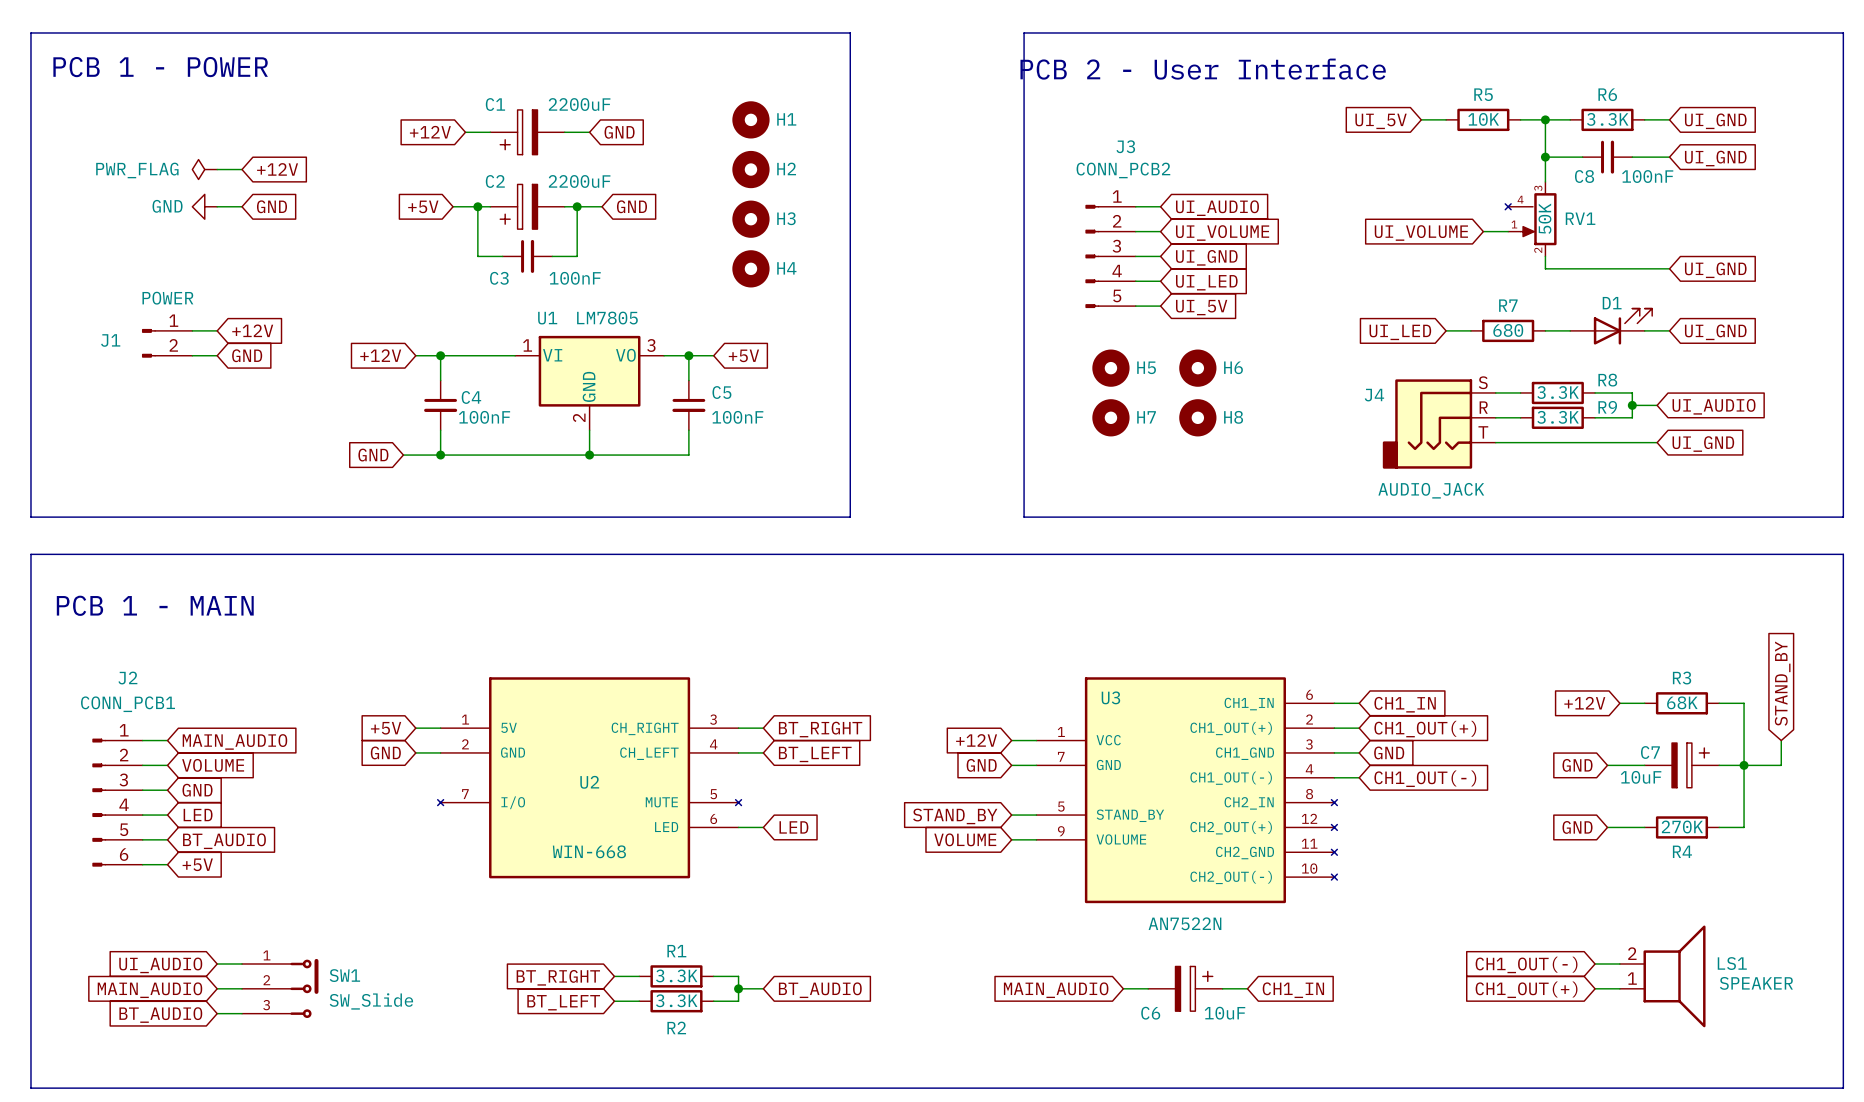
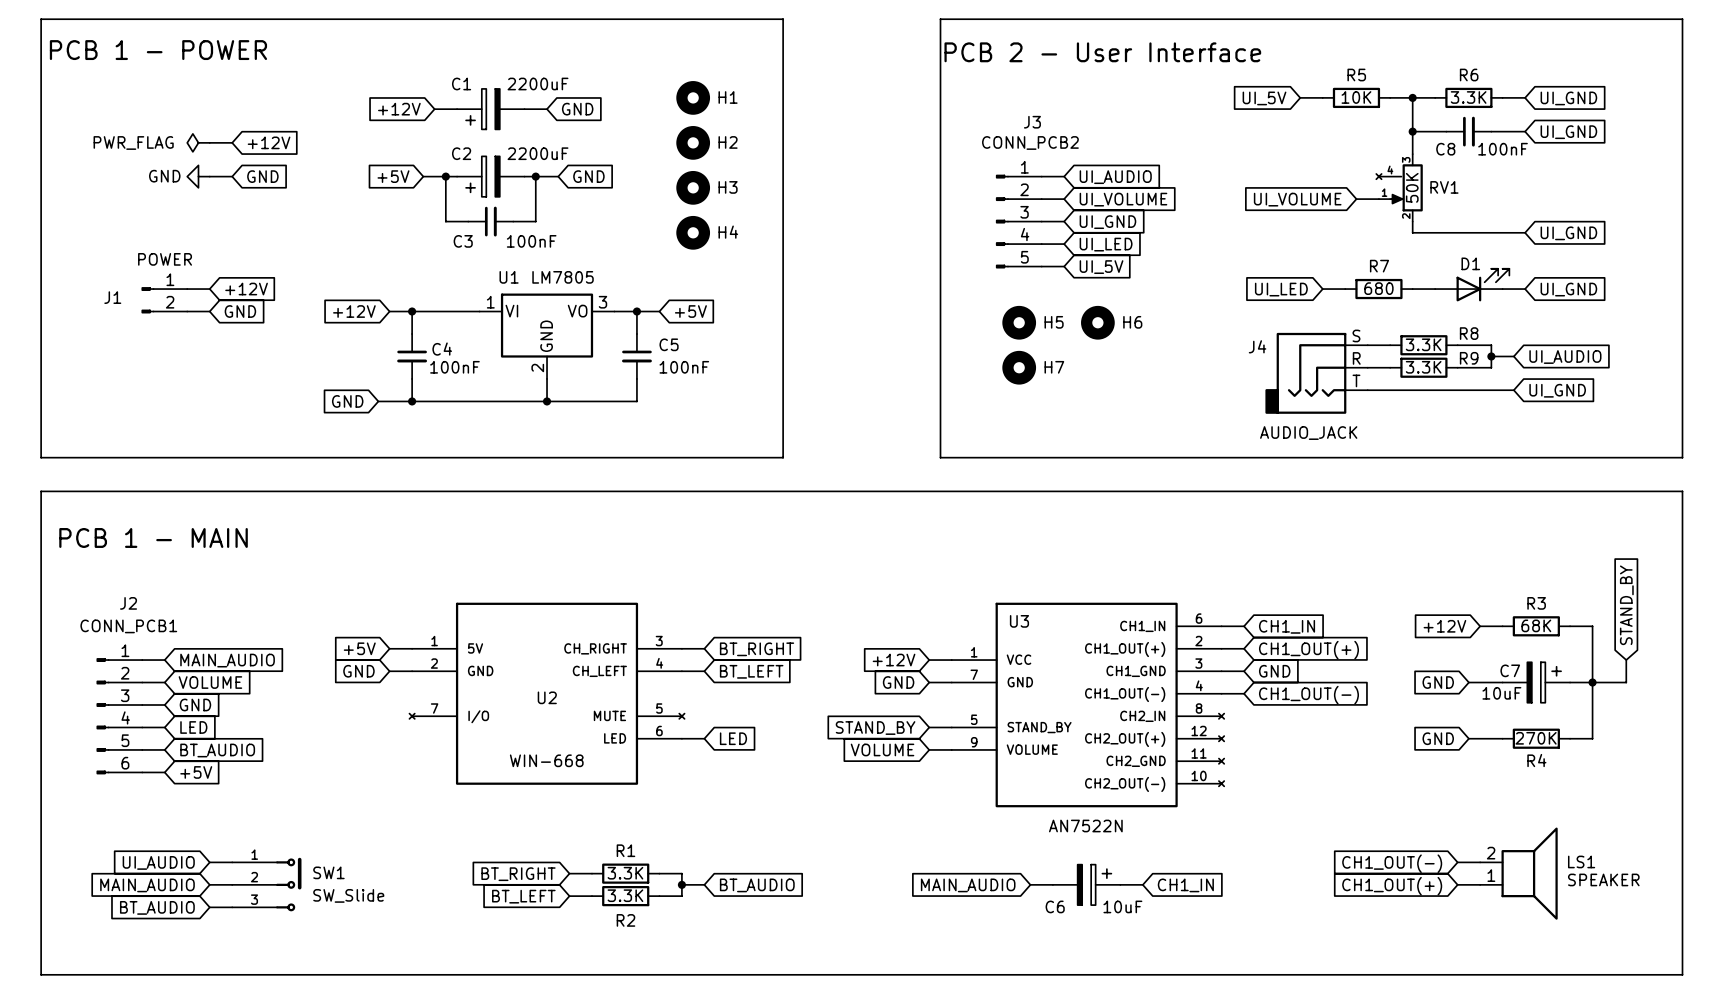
H8: (1197, 417) -> none

